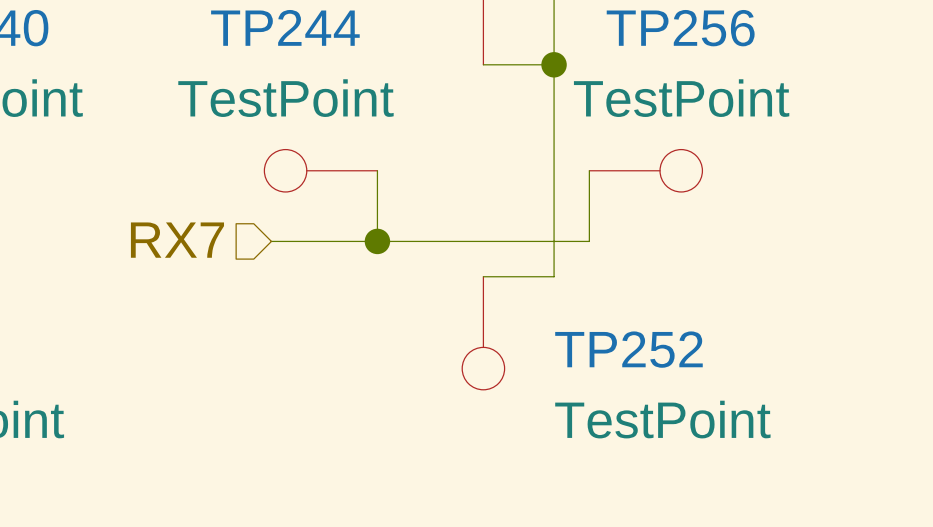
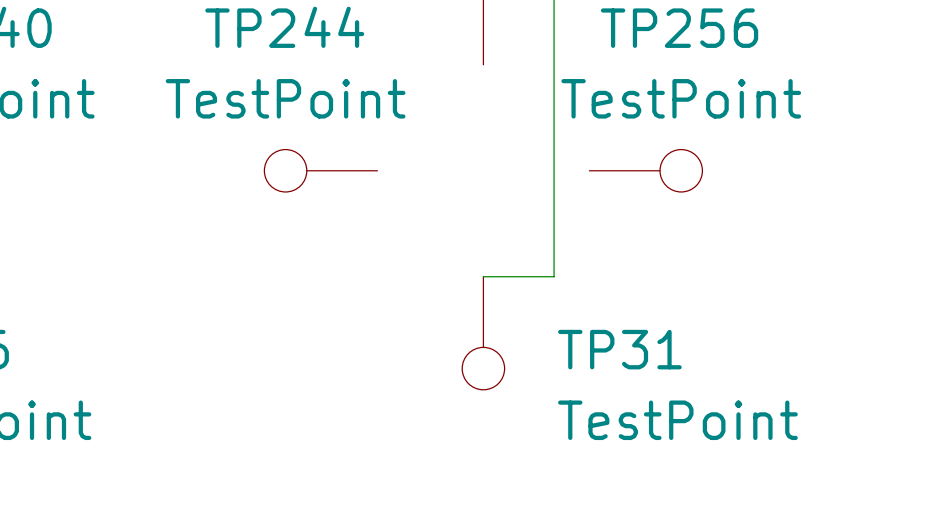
wire: (483, 64) (554, 64) -> none
junction: (554, 64) -> none
wire: (377, 170) (377, 241) -> none
wire: (589, 170) (589, 241) (271, 241) -> none
hierarchical label: RX7 (177, 240) -> none
junction: (377, 241) -> none
TP252 name: TP252 (628, 349) -> TP31 (619, 349)

